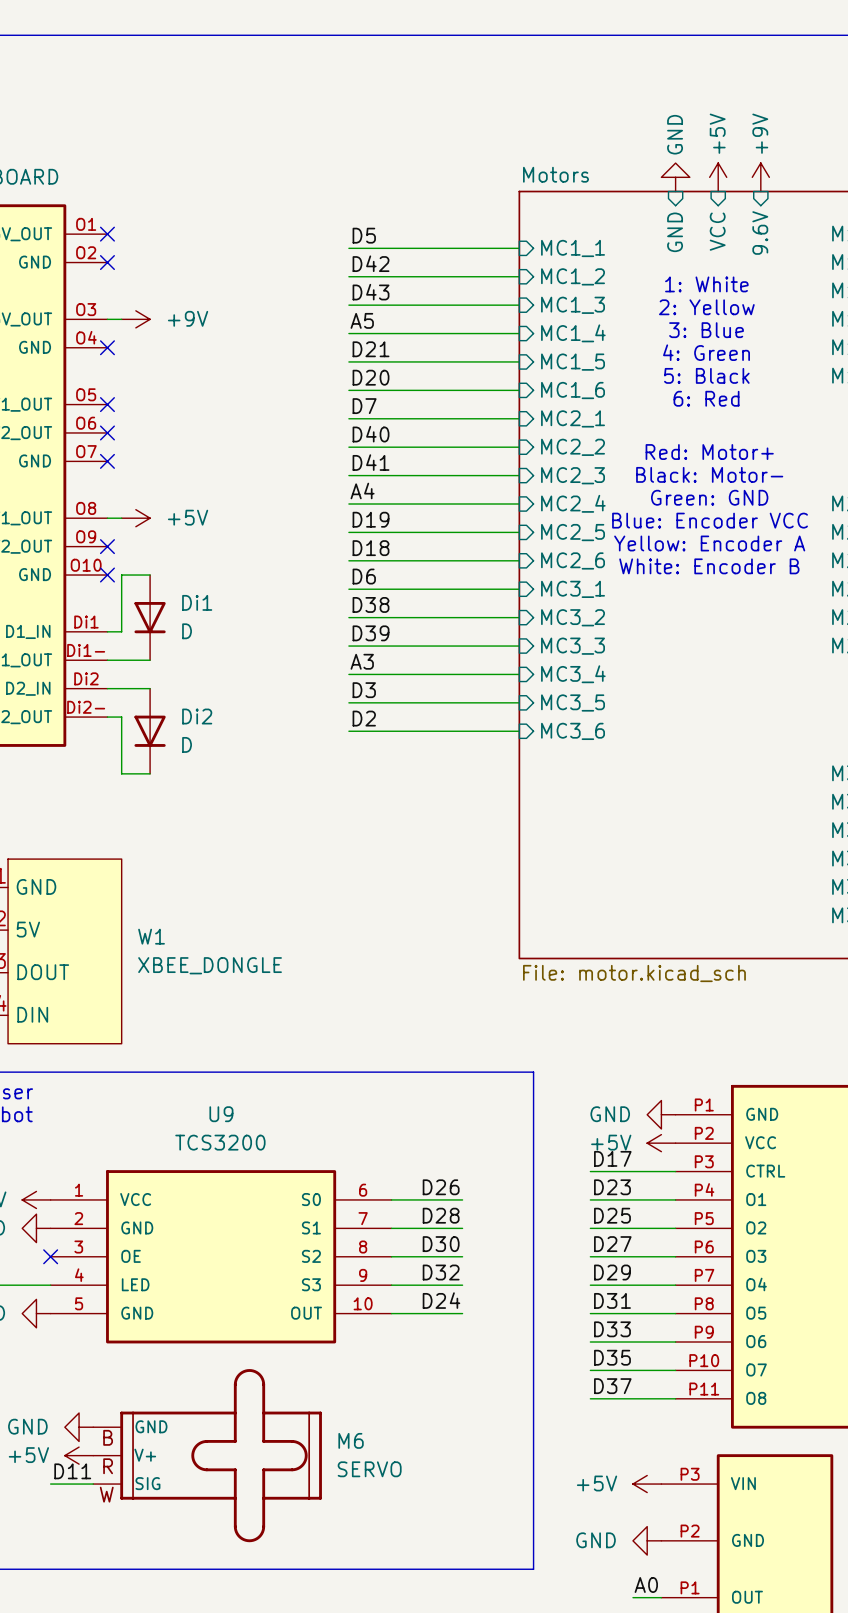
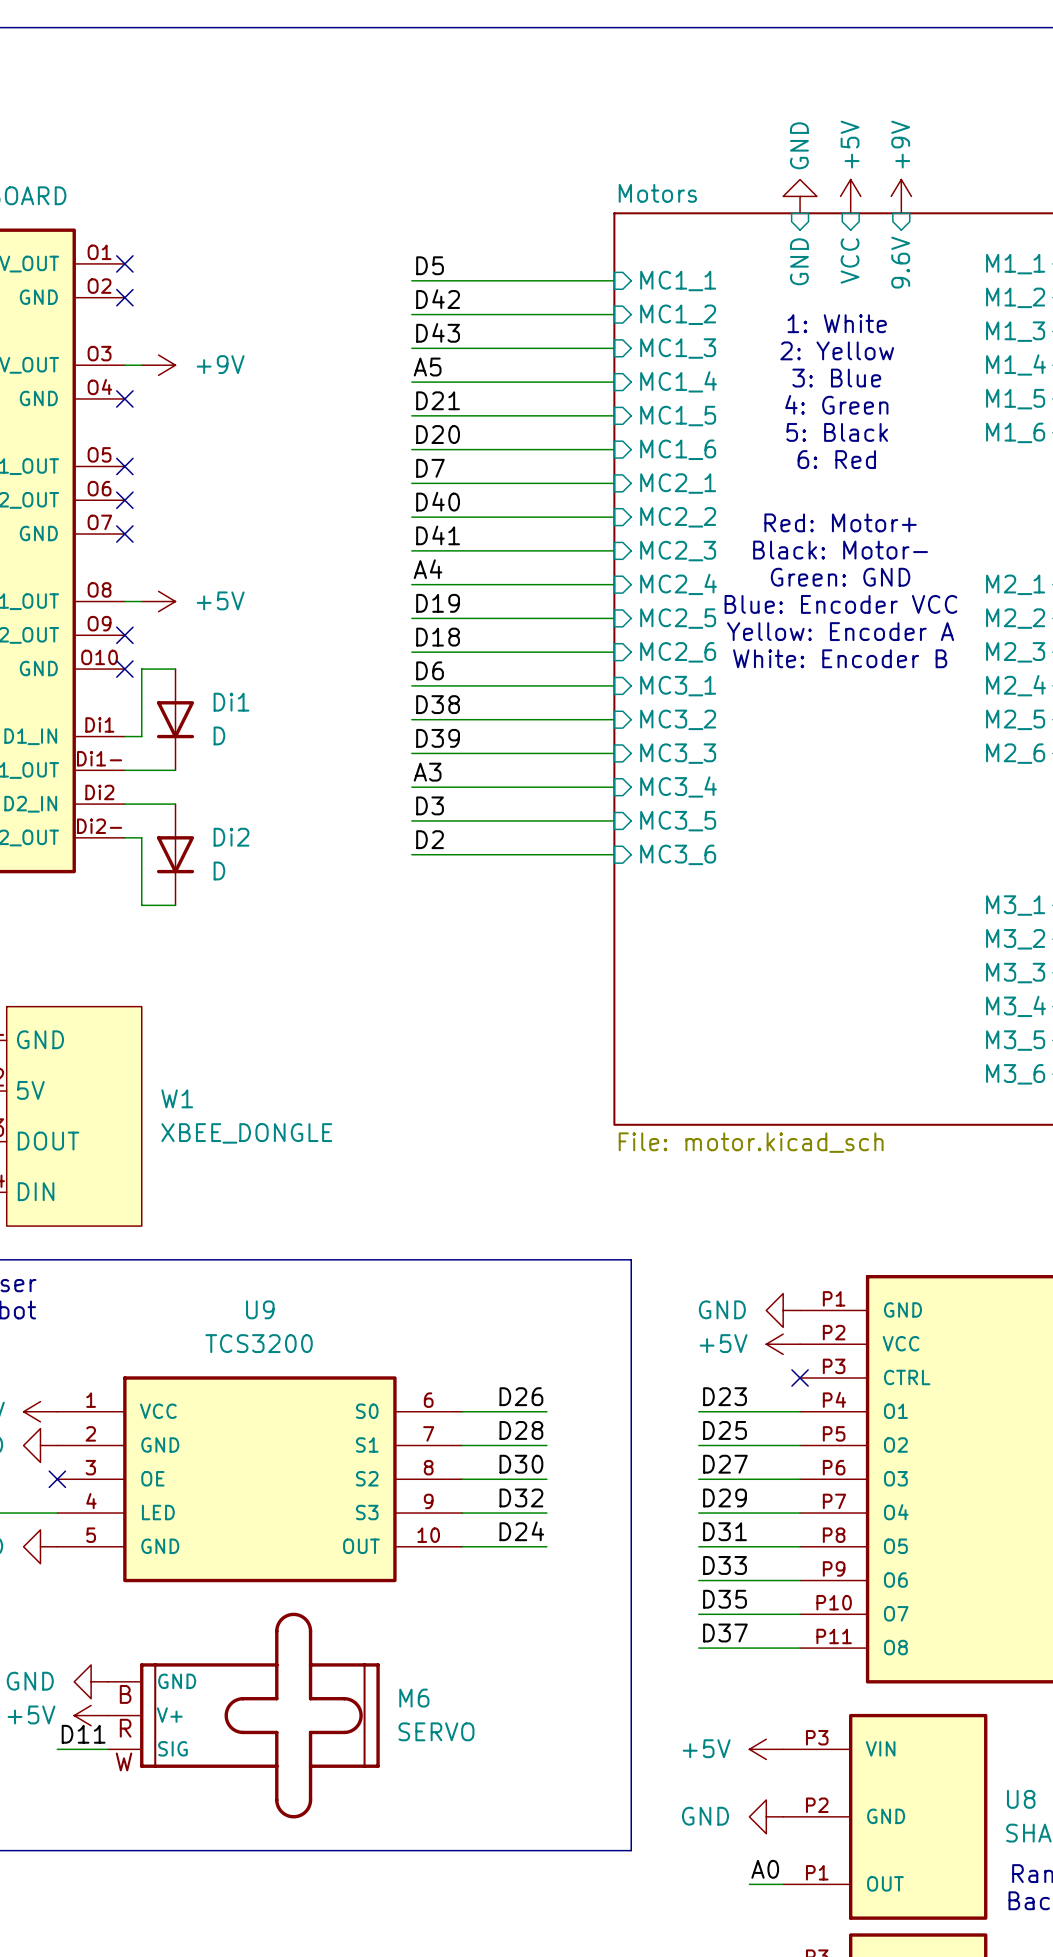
label: D17 (612, 1158) -> none
wire: (590, 1171) (675, 1171) -> none
no-connect mark: none -> (800, 1377)

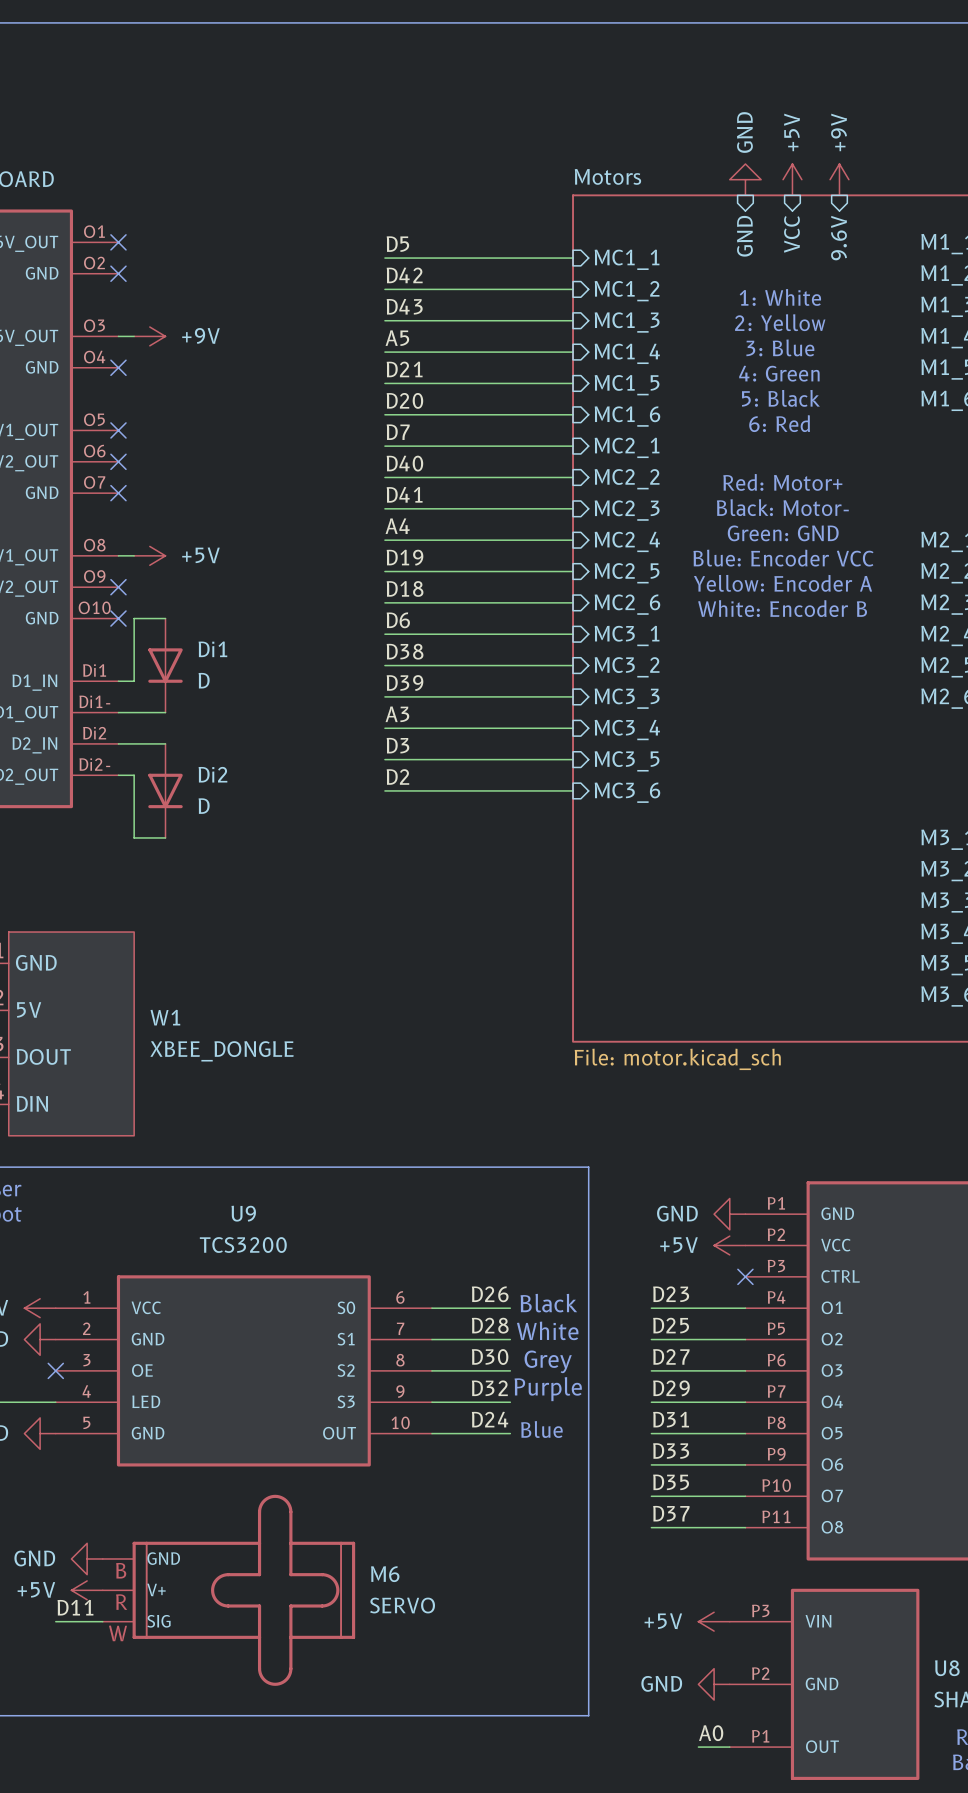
text: none -> Black (548, 1303)
text: none -> White (547, 1330)
text: none -> Grey (548, 1361)
text: none -> Purple (548, 1389)
text: none -> Blue (541, 1429)

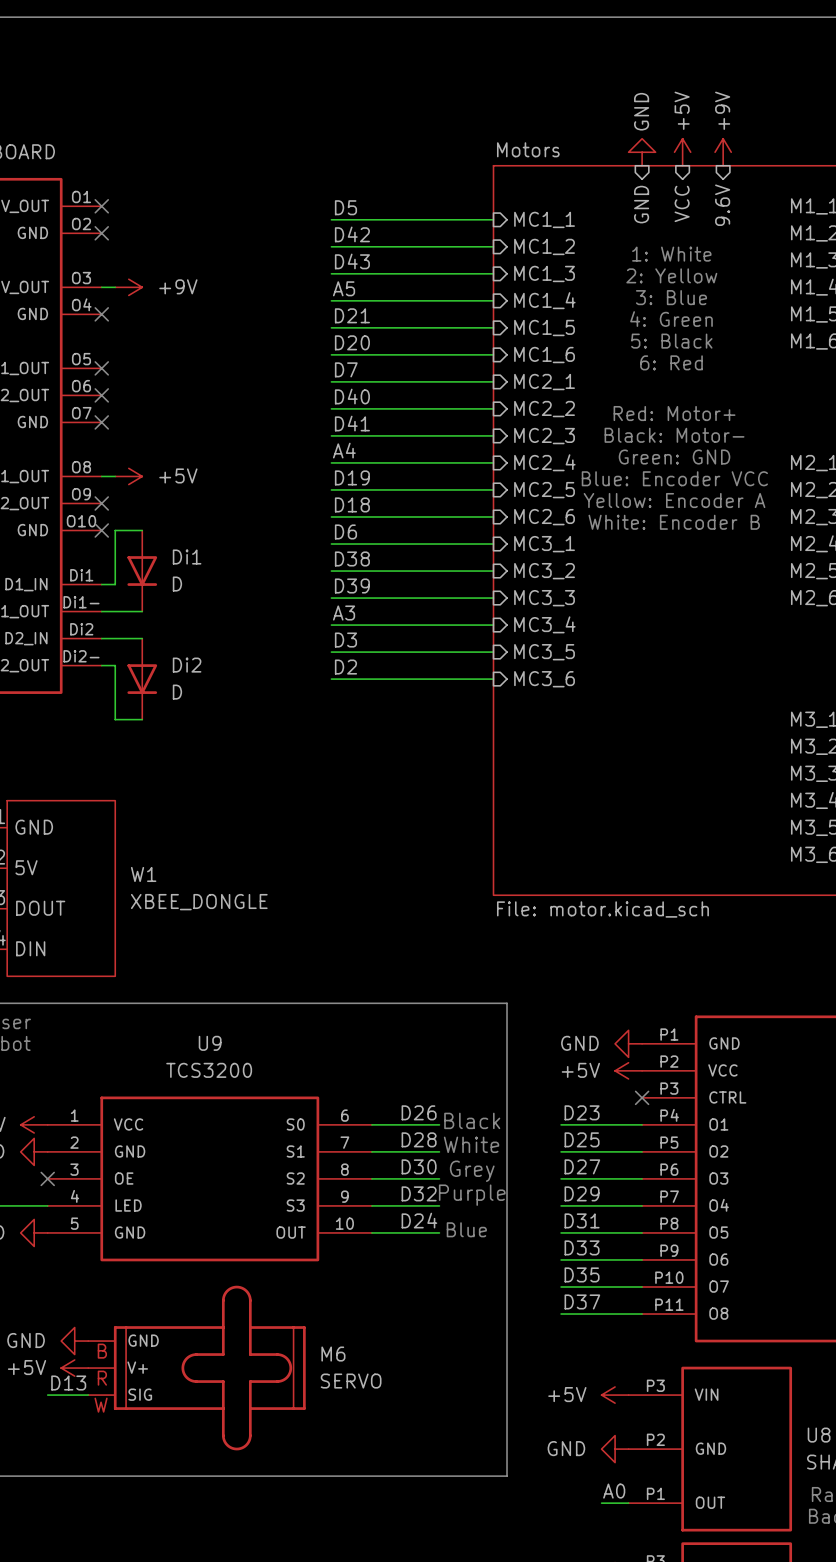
label: D11 (75, 1607) -> D13 (68, 1383)

